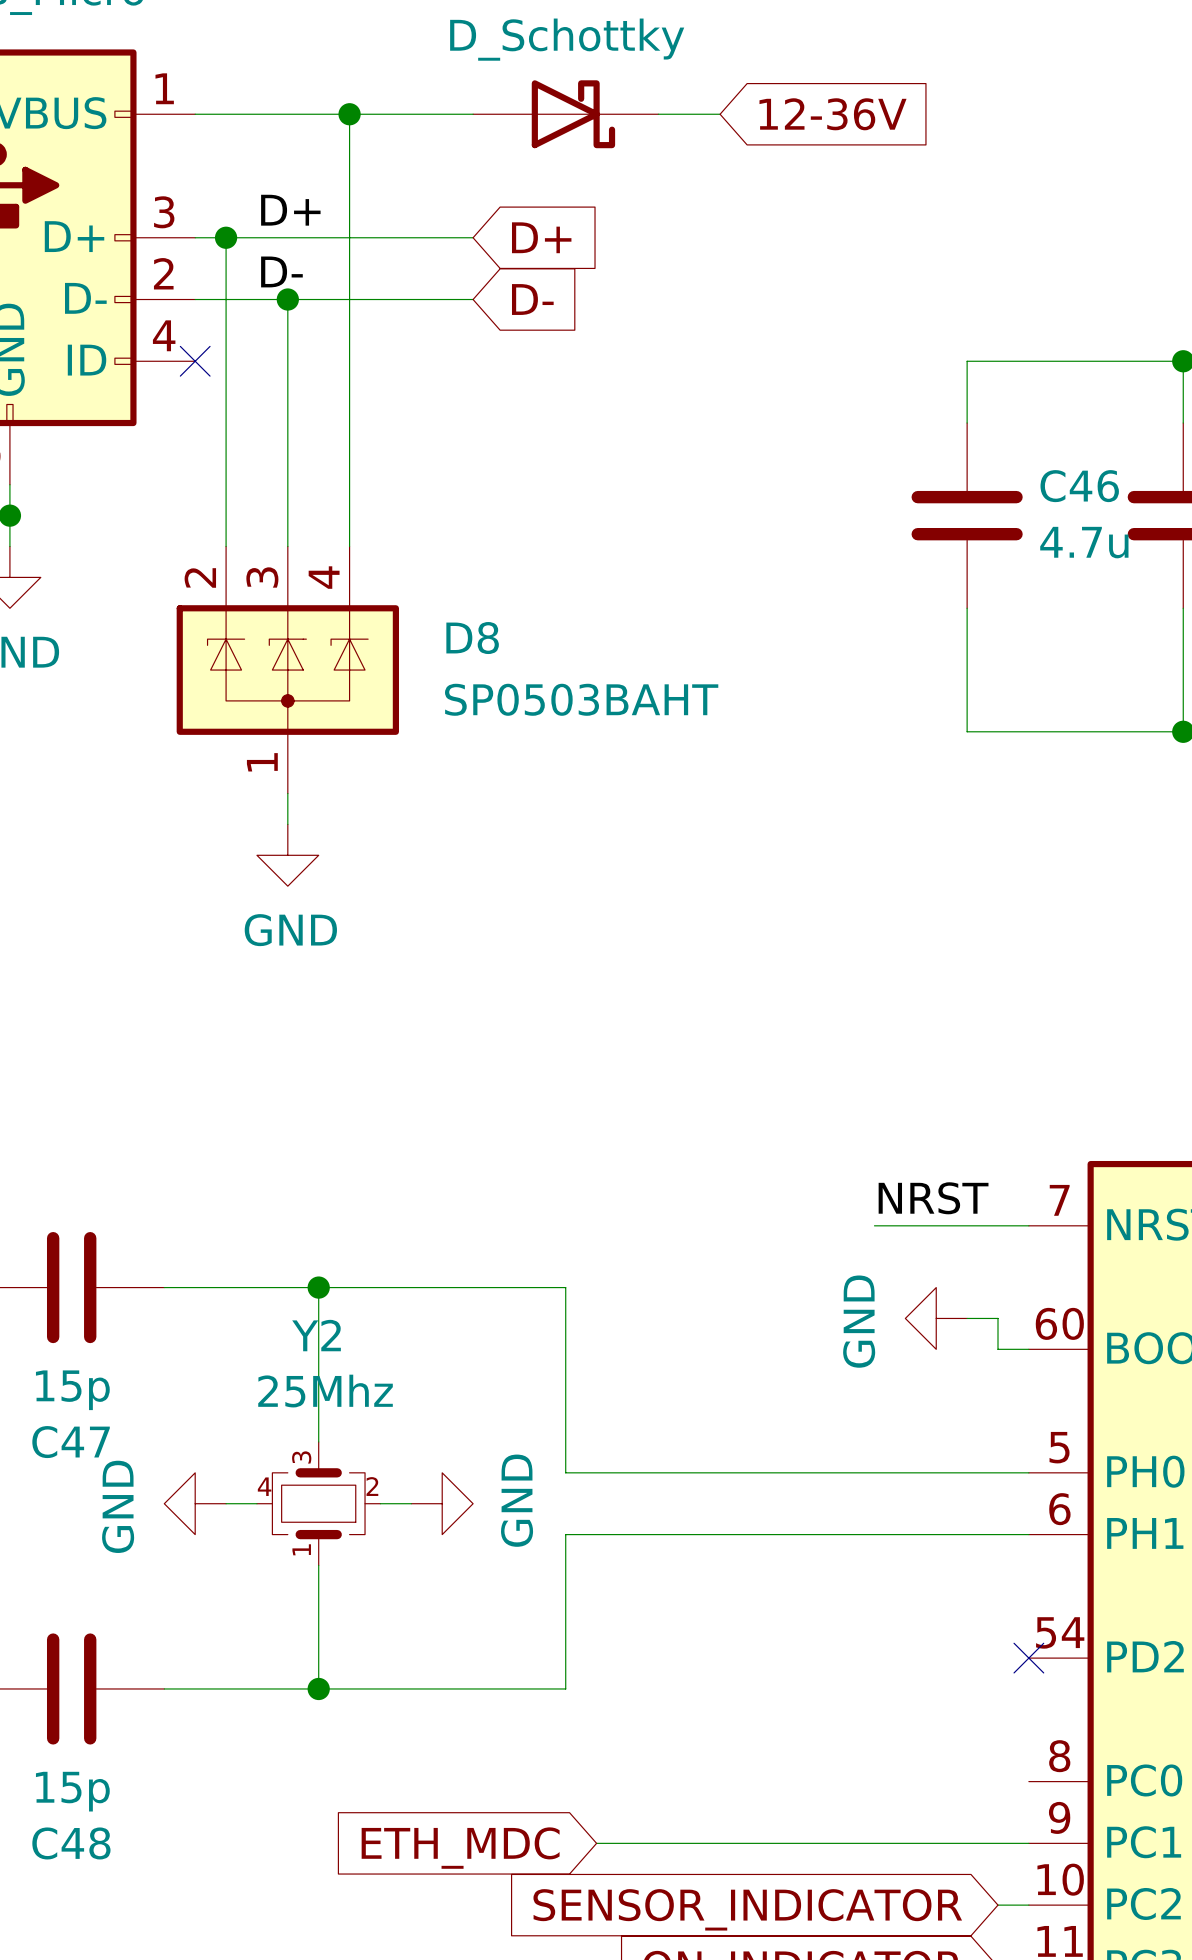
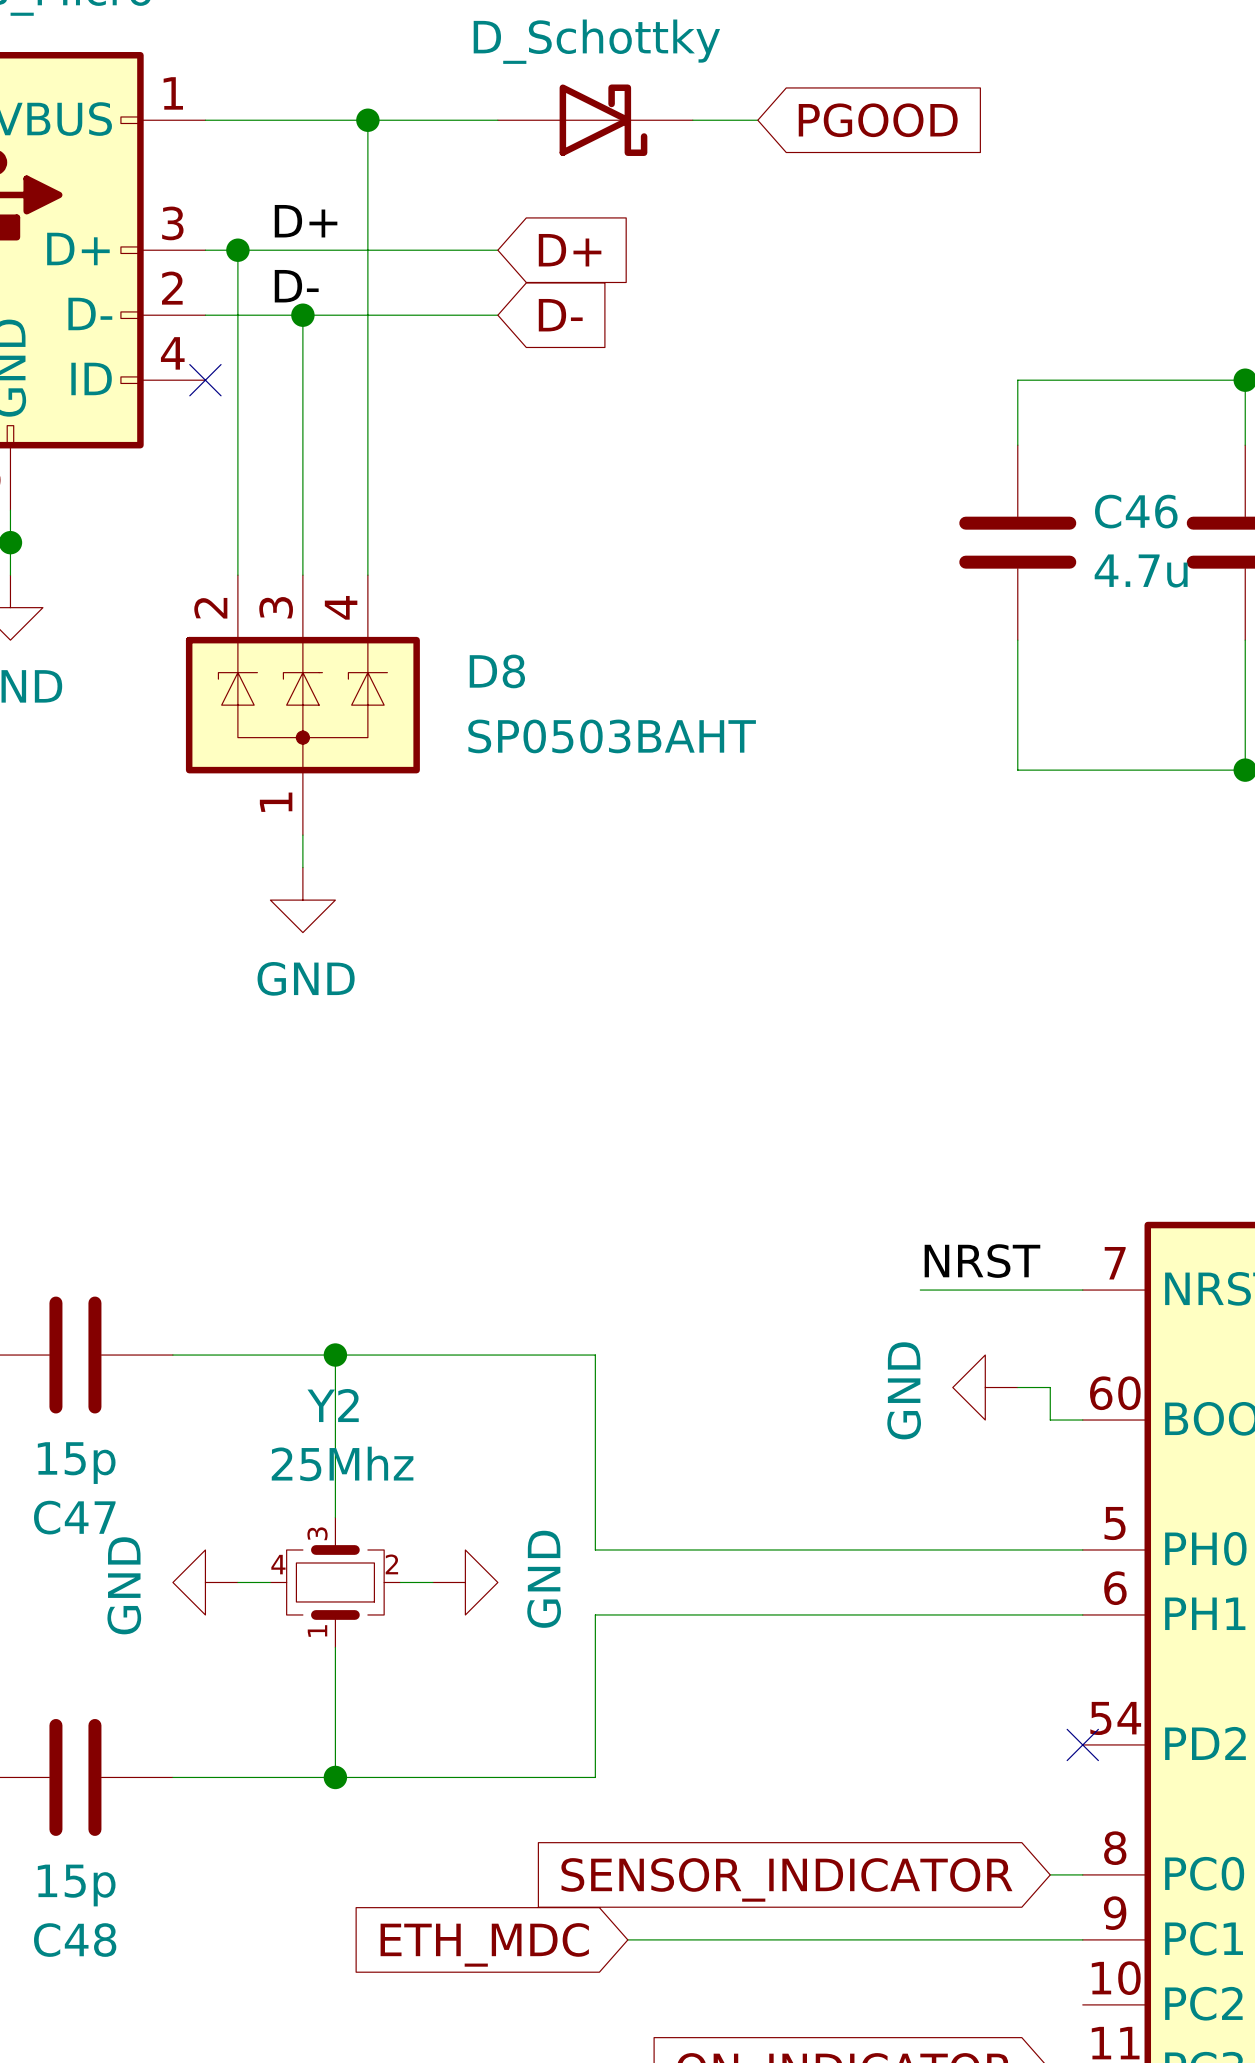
global label: 12-36V (833, 114) -> PGOOD (878, 120)
wire: (998, 1905) (1028, 1905) -> (1050, 1874) (1082, 1874)
global label position: SENSOR_INDICATOR (747, 1909) -> SENSOR_INDICATOR (786, 1879)

